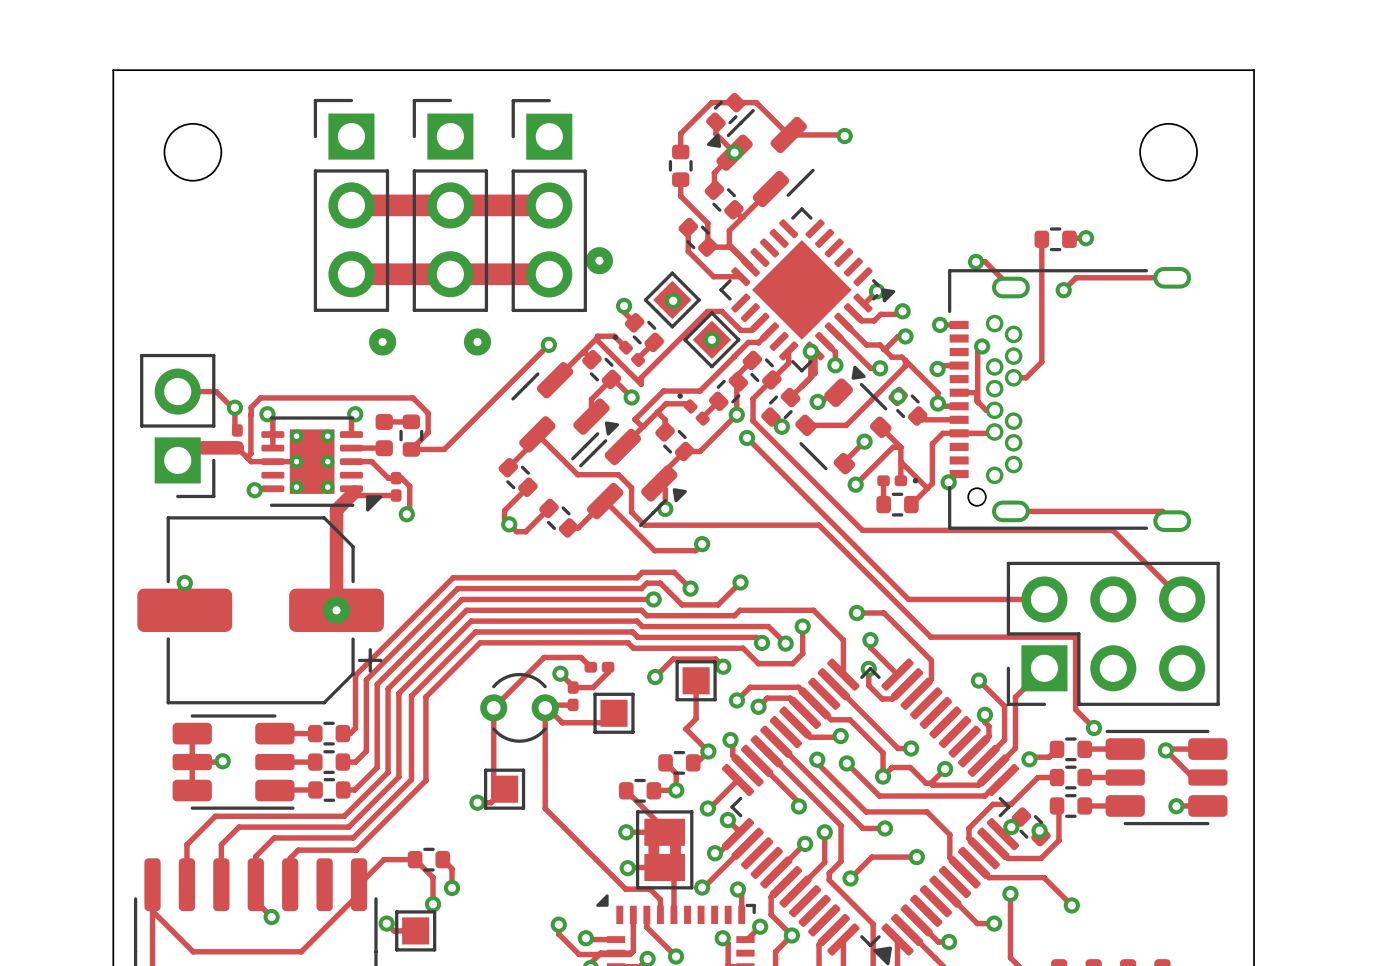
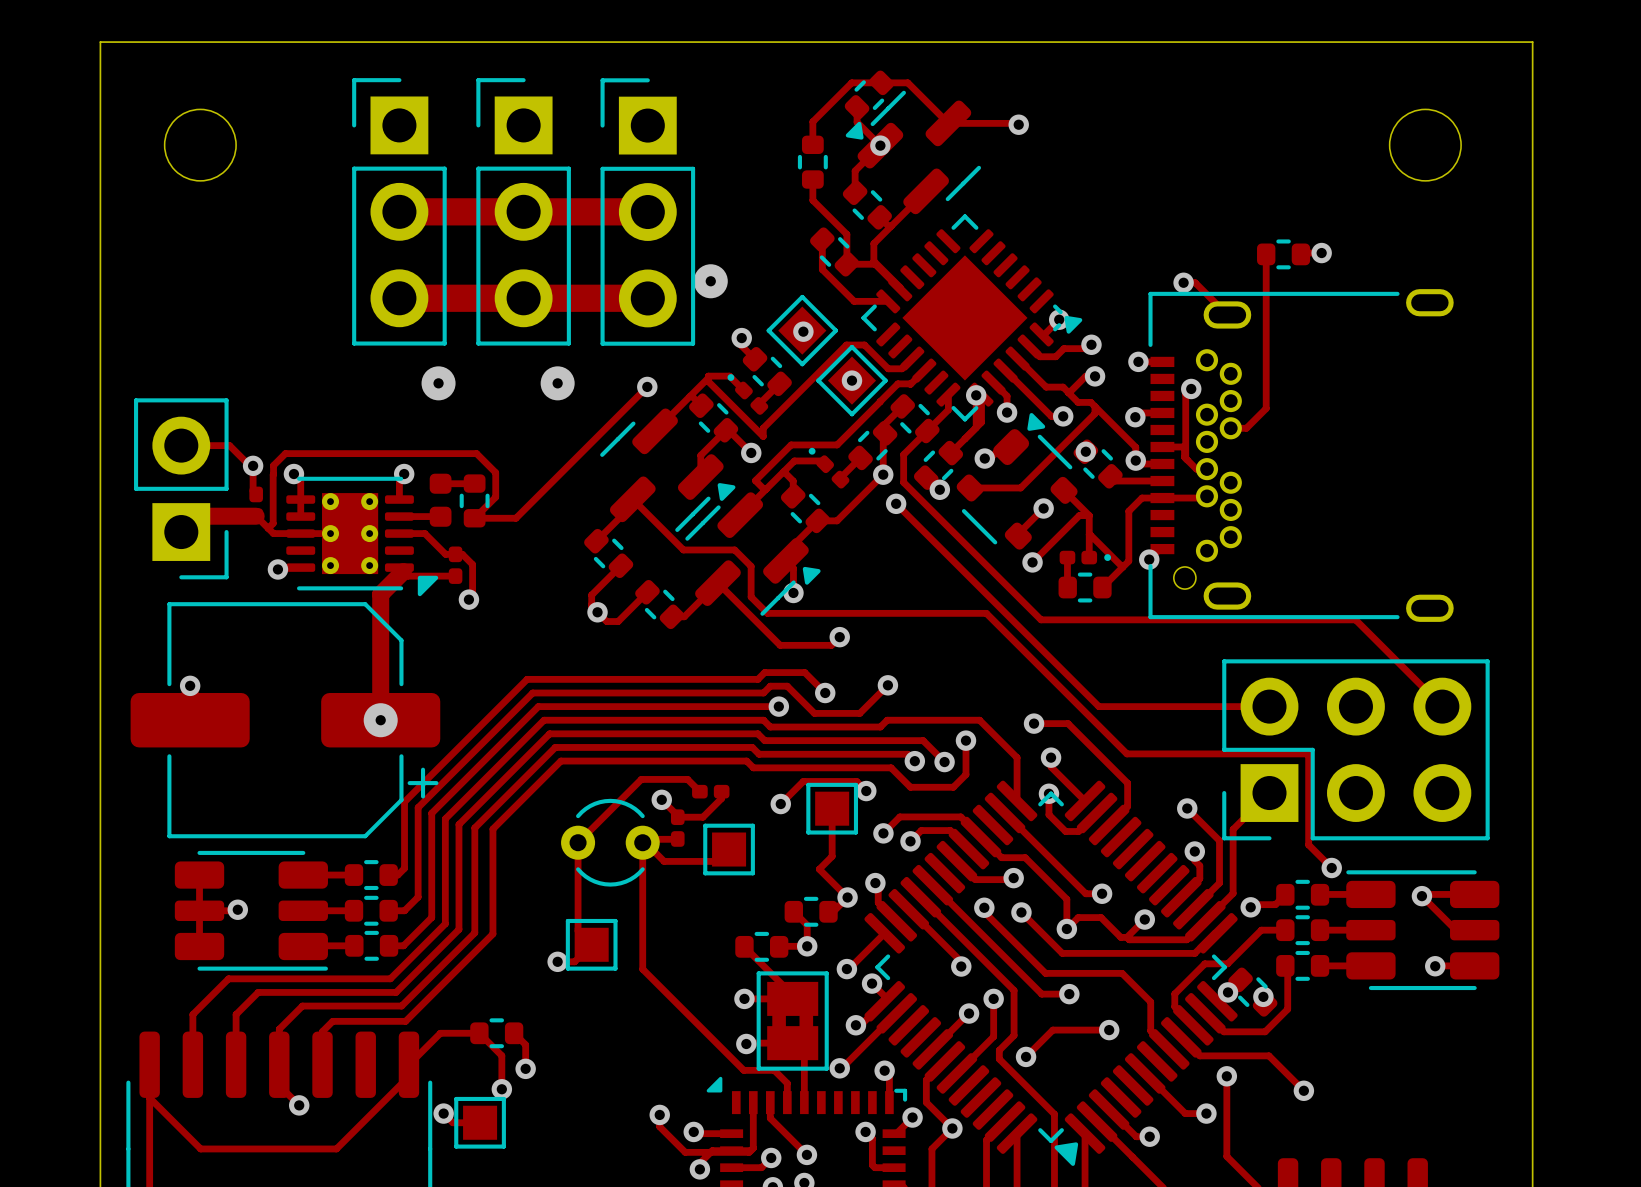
track: (1172, 277) (1076, 277) (1063, 290) -> none
via: (1063, 290) -> none
track: (1010, 511) (1162, 511) (1172, 521) -> none

